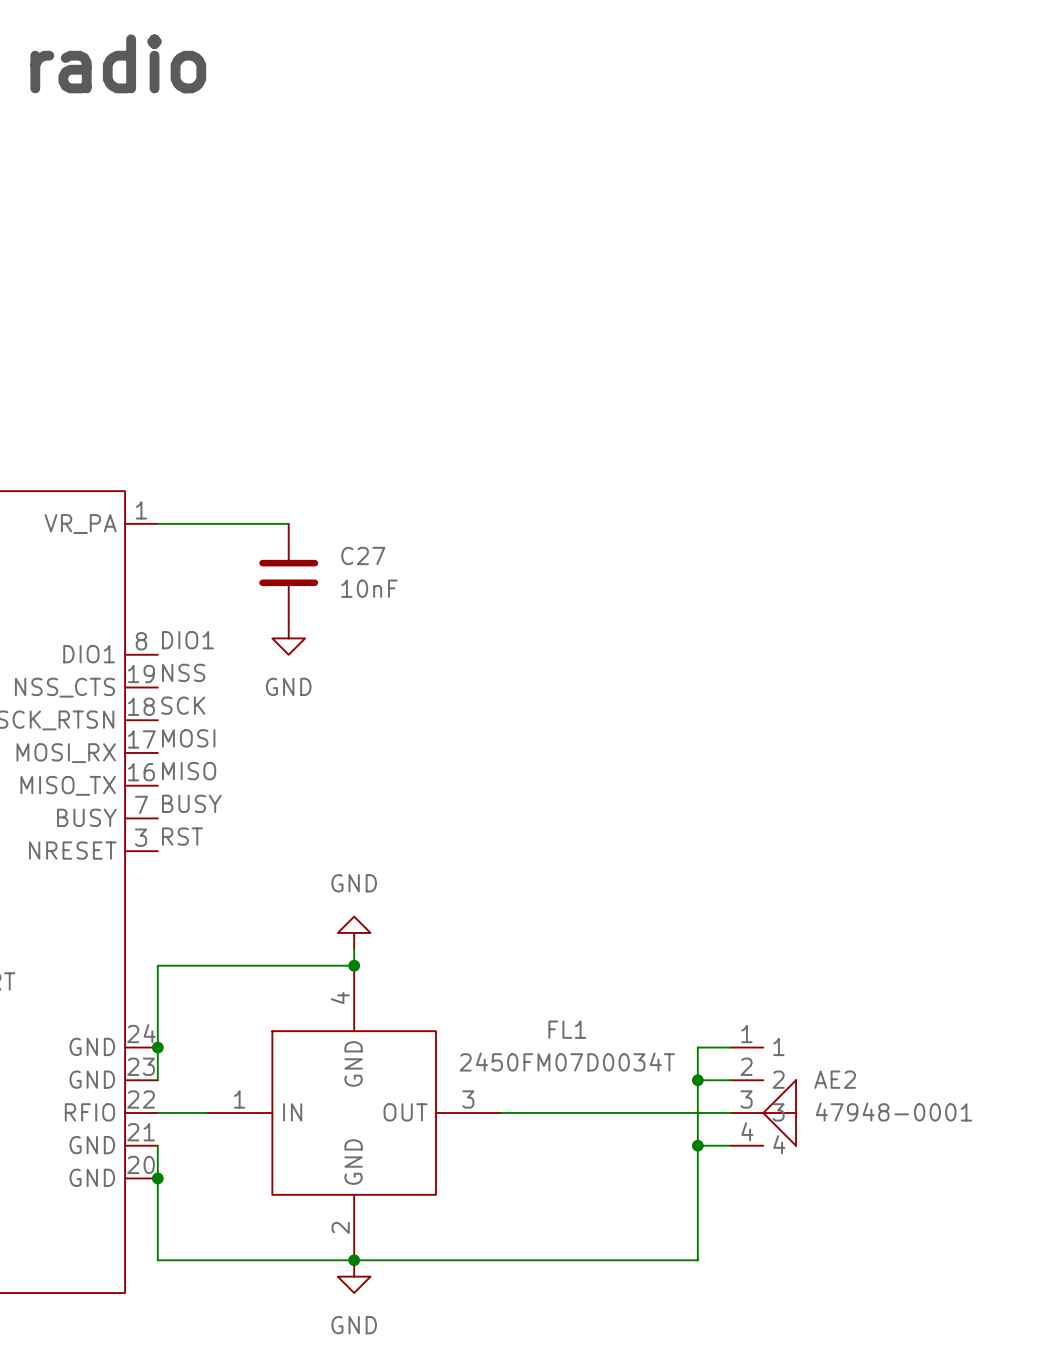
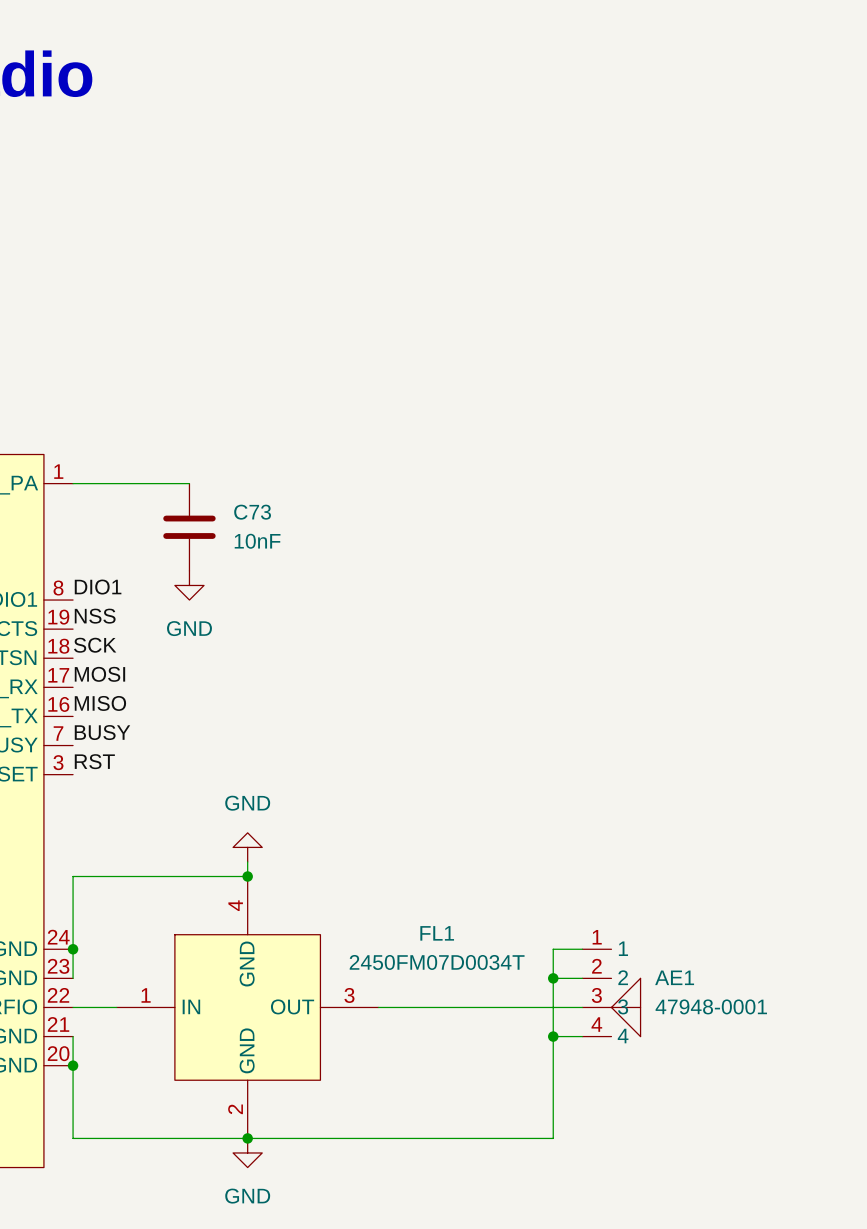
C27 name: C27 (363, 555) -> C73 (252, 512)
AE2 name: AE2 (835, 1079) -> AE1 (674, 977)

